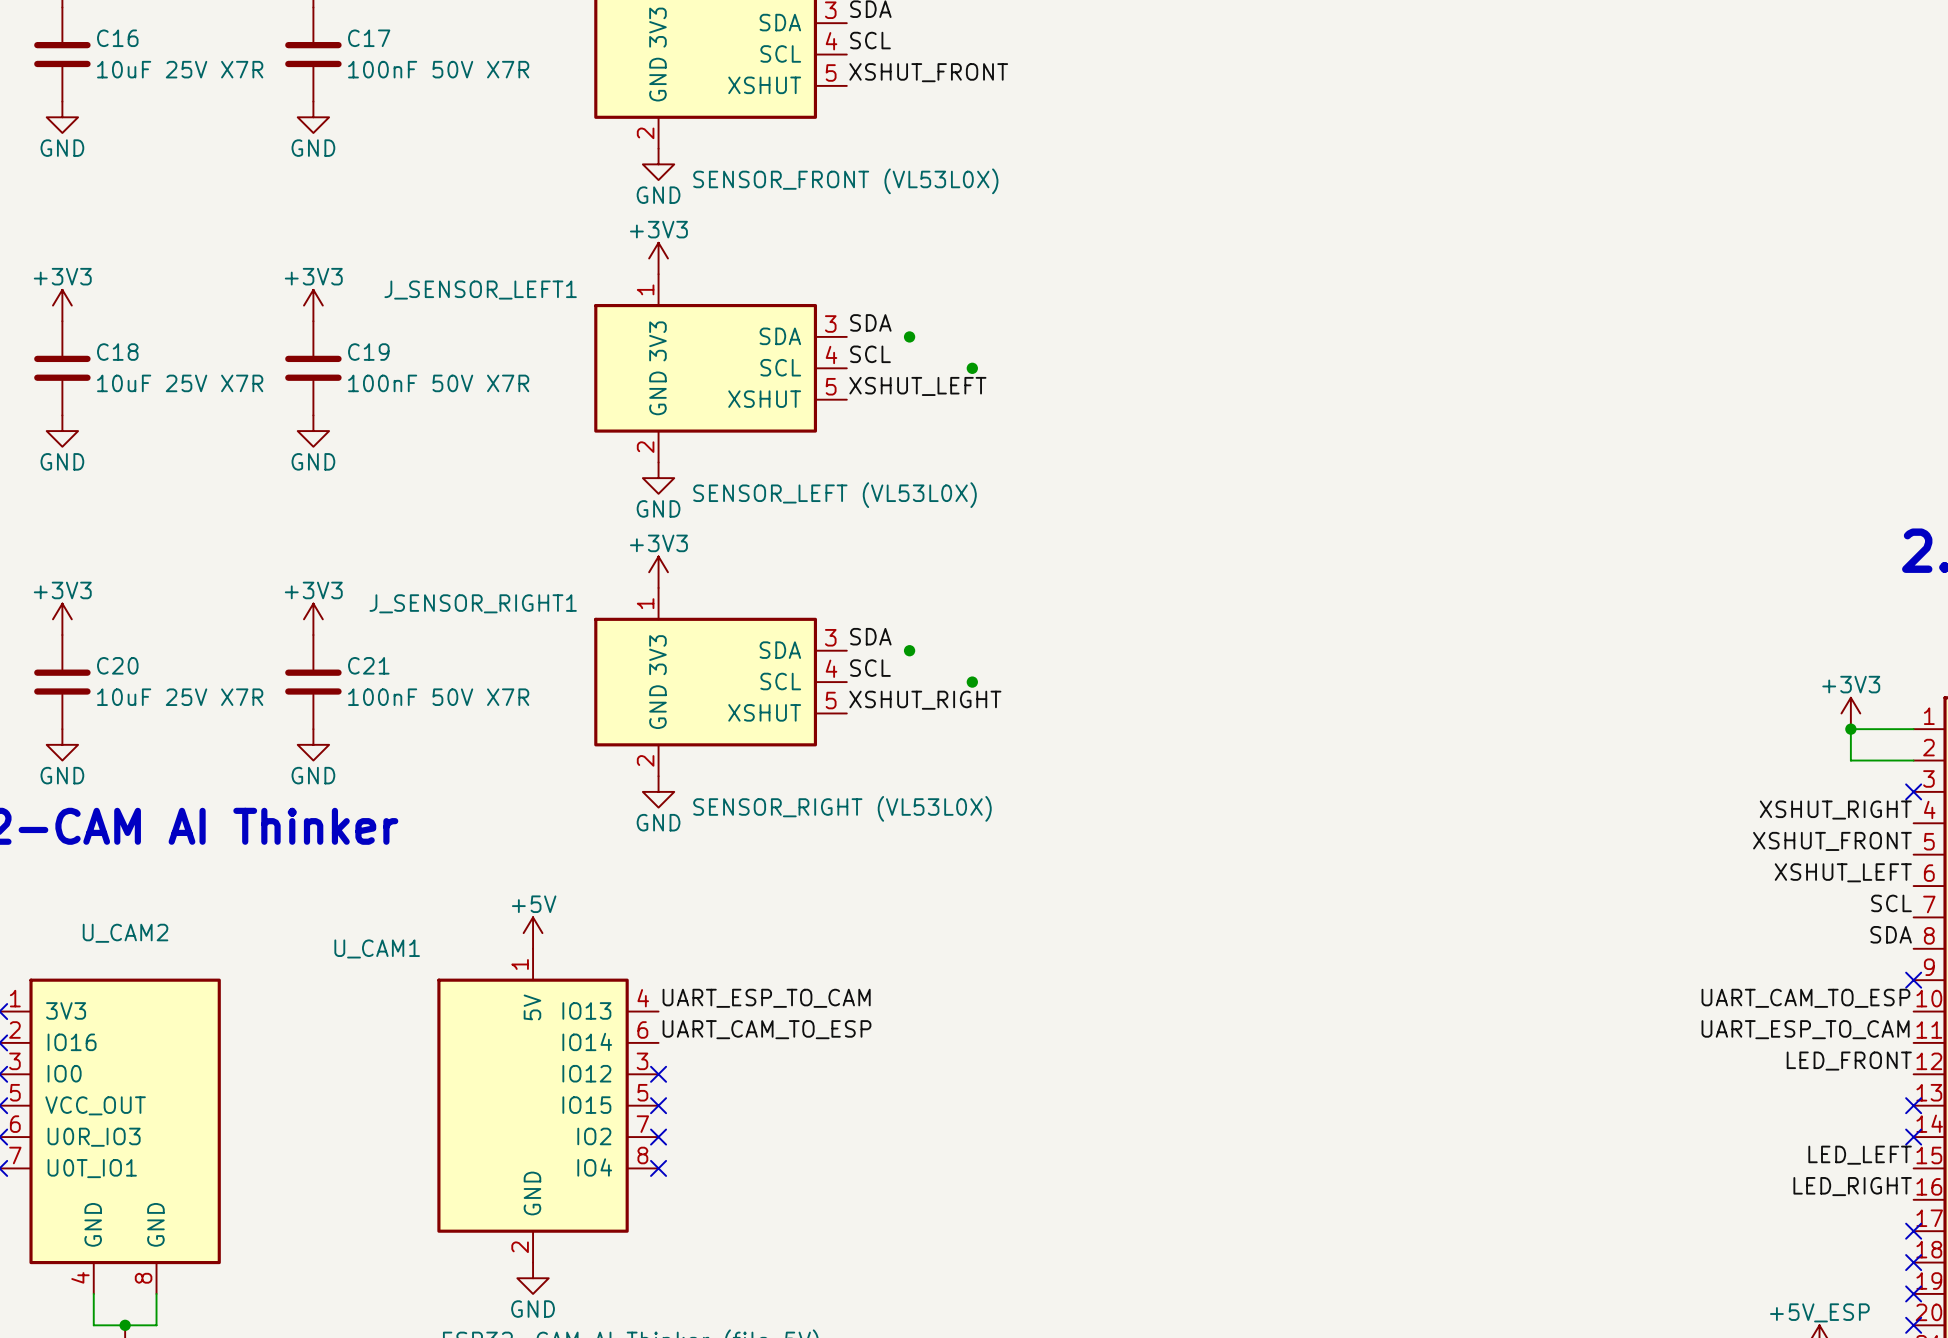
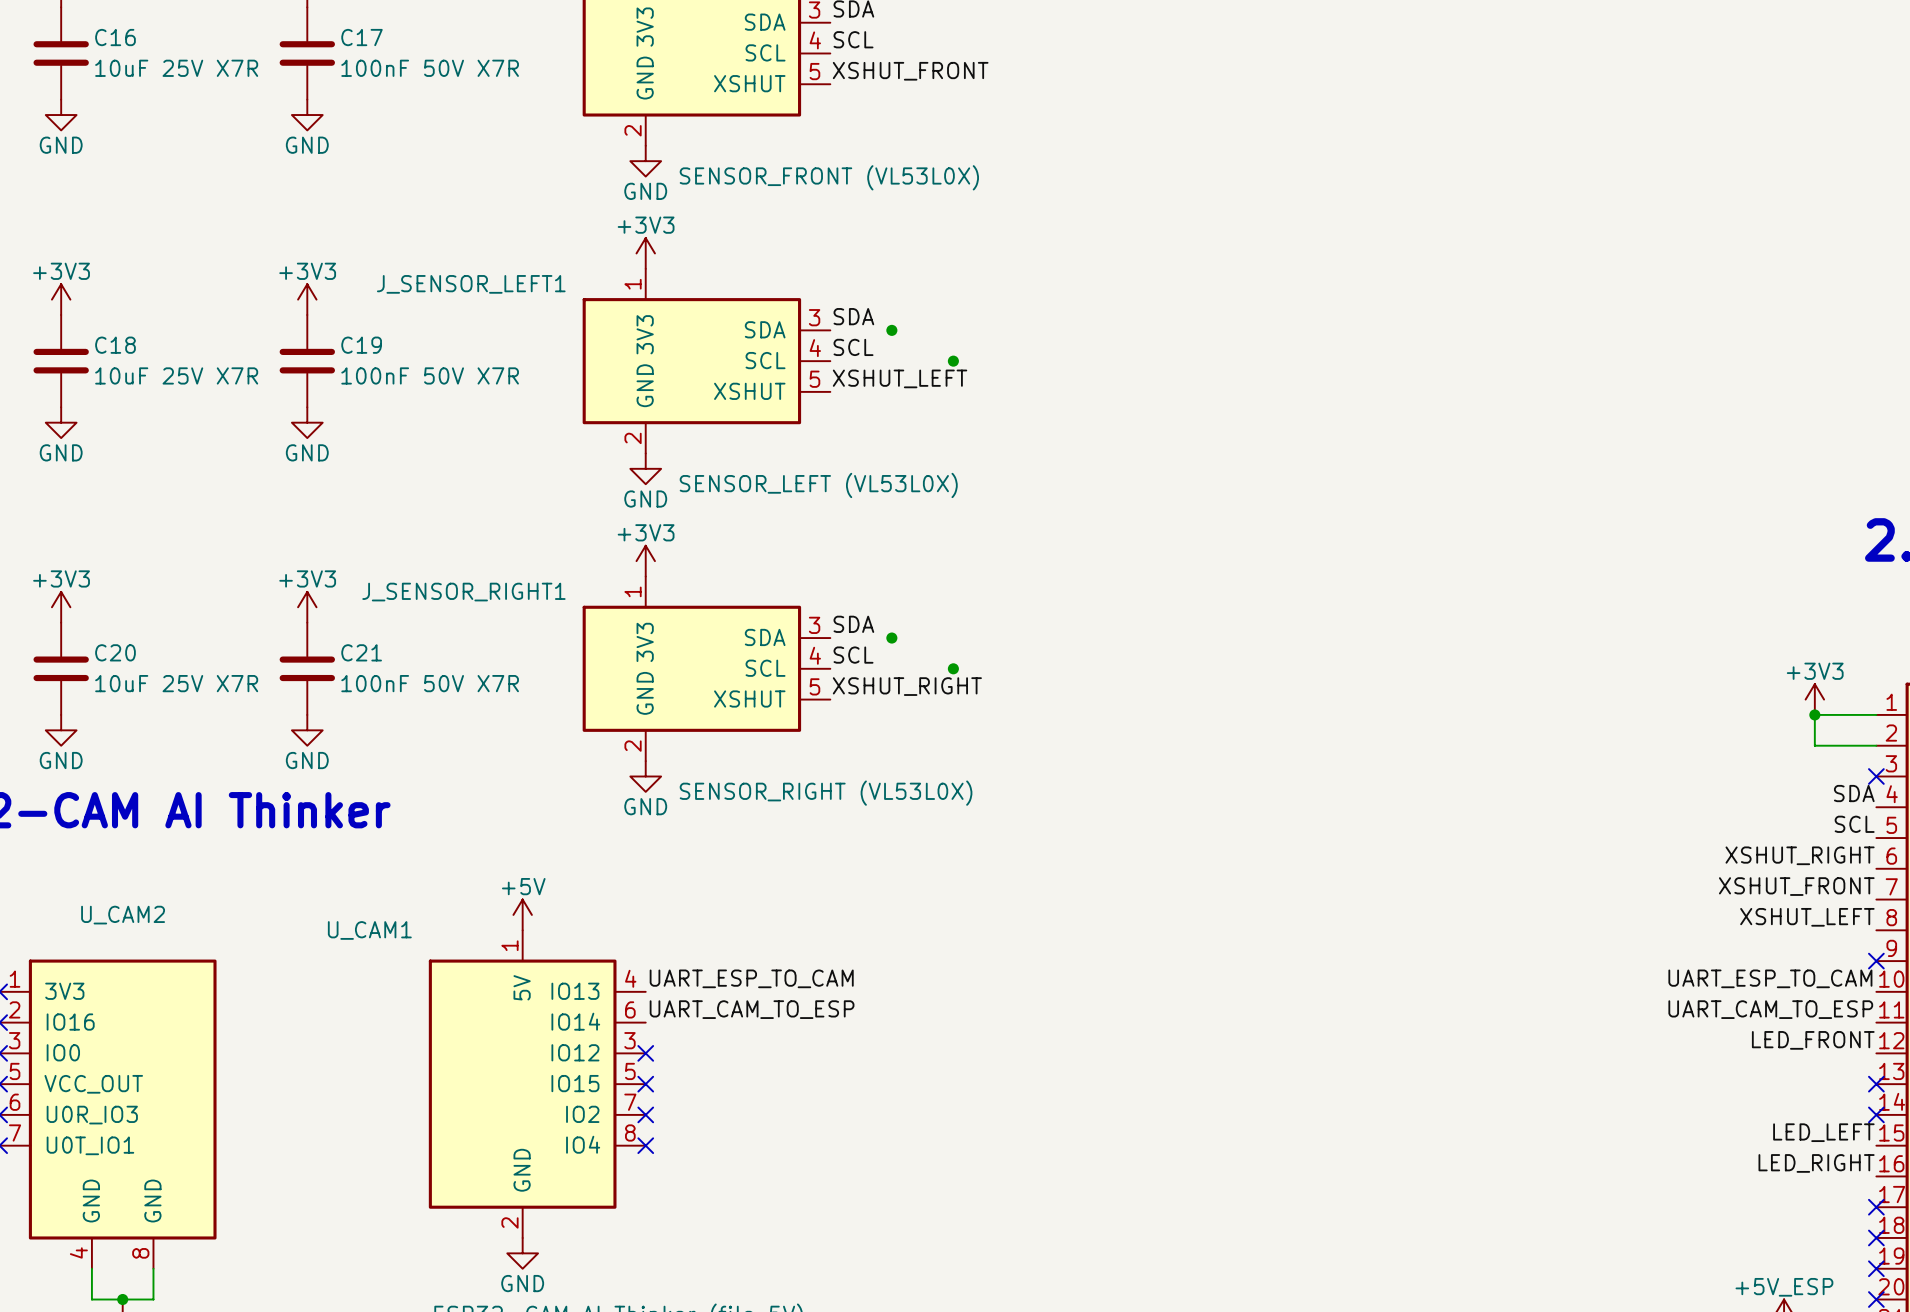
label: XSHUT_RIGHT (1835, 810) -> SDA (1854, 793)
label: XSHUT_FRONT (1832, 841) -> SCL (1854, 824)
label: XSHUT_LEFT (1843, 872) -> XSHUT_RIGHT (1800, 855)
label: SCL (1891, 903) -> XSHUT_FRONT (1796, 886)
label: SDA (1891, 934) -> XSHUT_LEFT (1807, 917)
label: UART_CAM_TO_ESP (1805, 998) -> UART_ESP_TO_CAM (1770, 978)
label: UART_ESP_TO_CAM (1805, 1029) -> UART_CAM_TO_ESP (1770, 1009)

